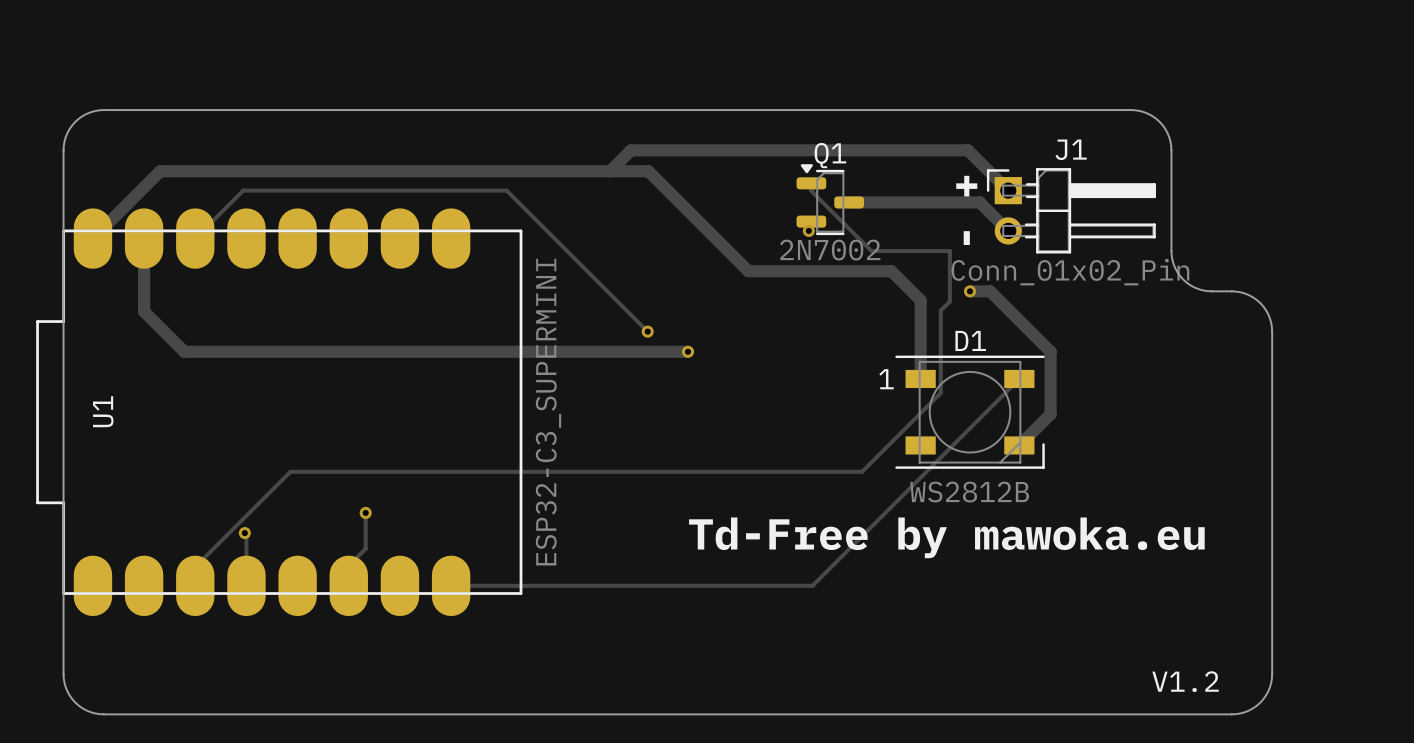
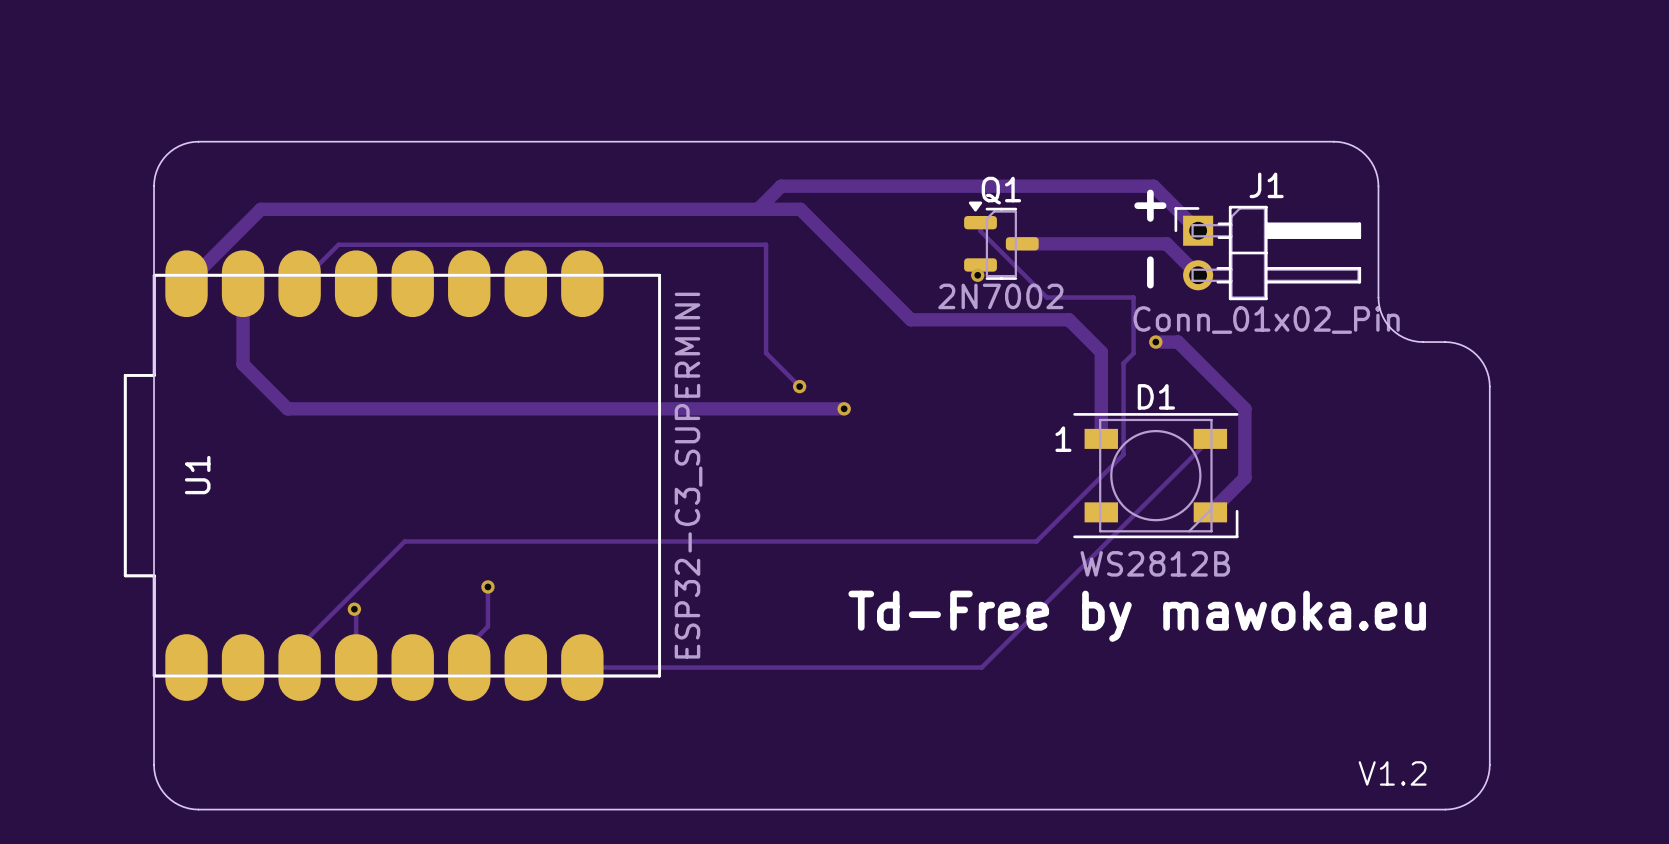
track: (230, 203) (243, 190) (506, 190) (617, 301) -> (338, 244) (766, 244) (766, 353)

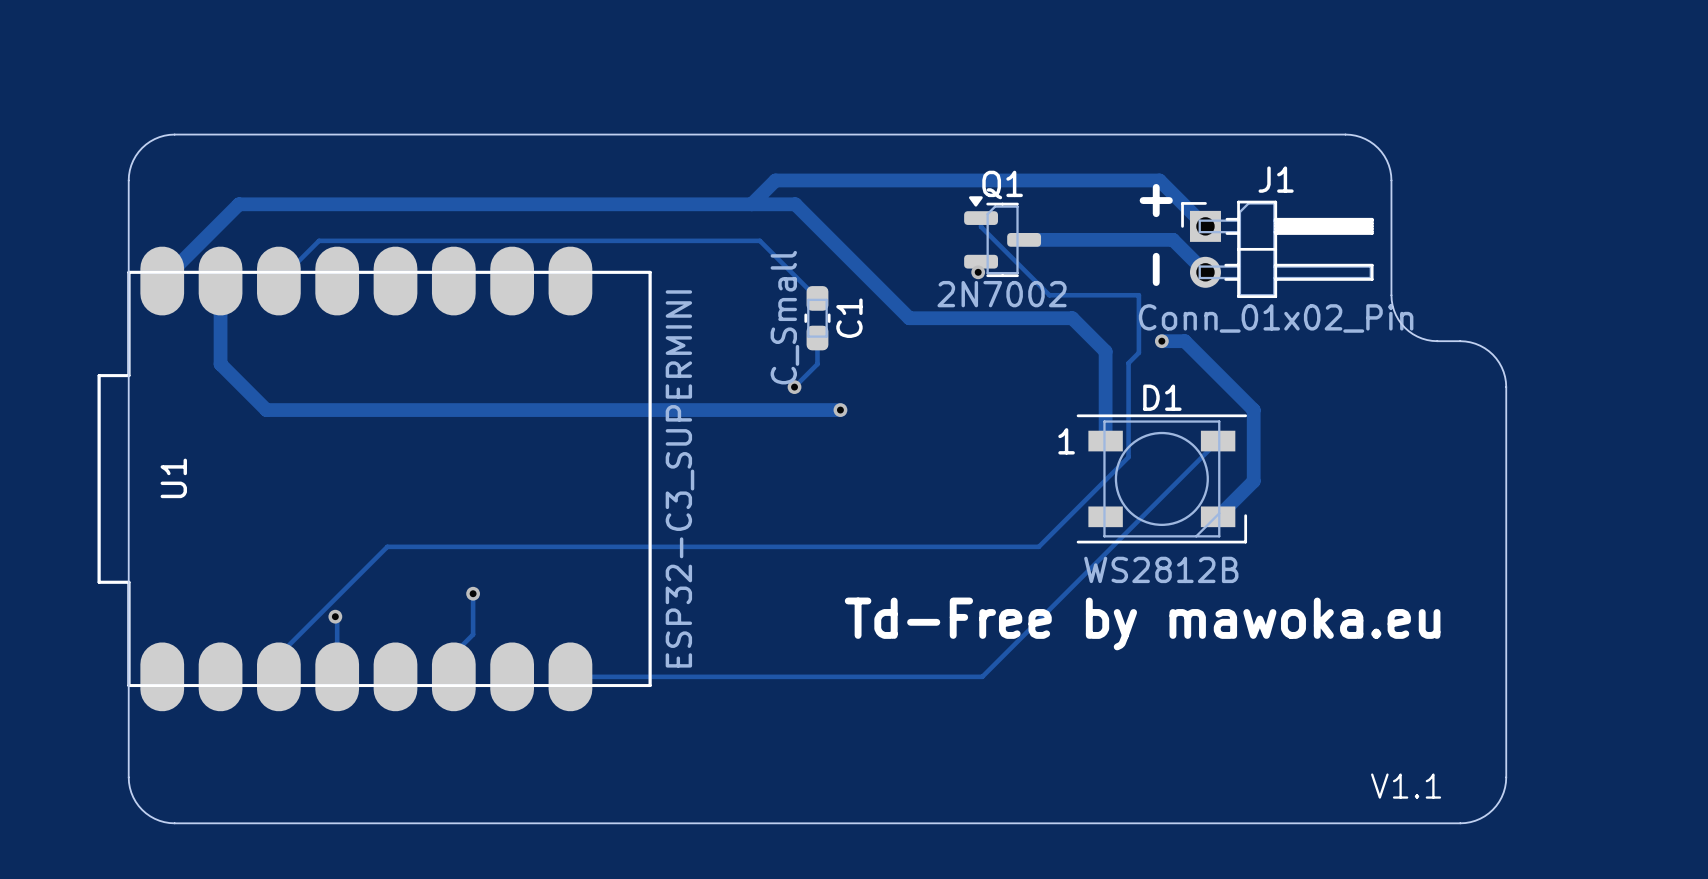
track: (766, 244) (766, 353) (799, 386) -> (759, 240) (817, 298)
C1: none -> C_Small (817, 318)
track: none -> (817, 338) (817, 364) (794, 387)
text: V1.2 (1392, 773) -> V1.1 (1406, 786)

